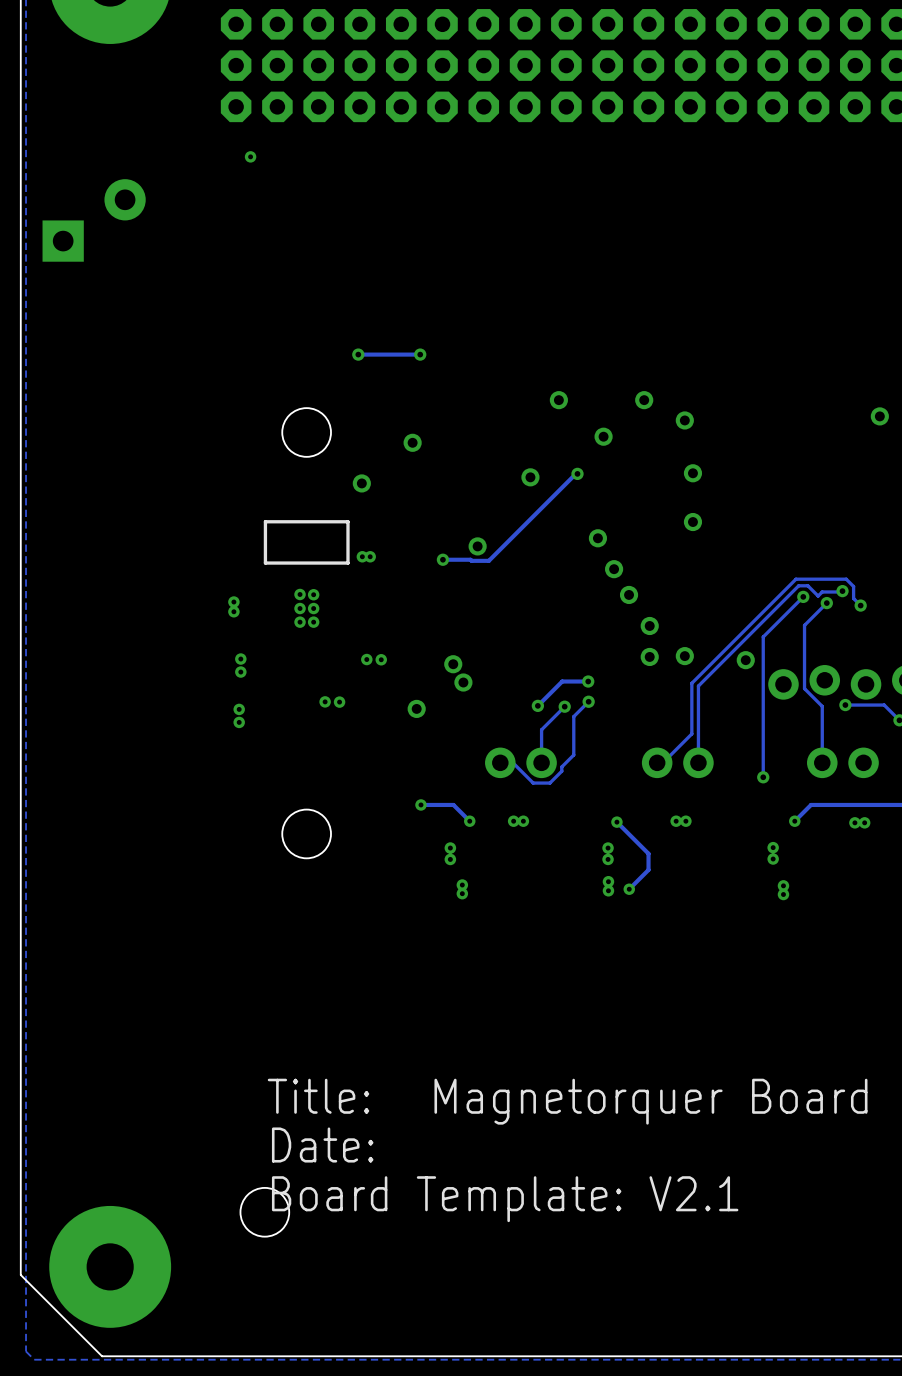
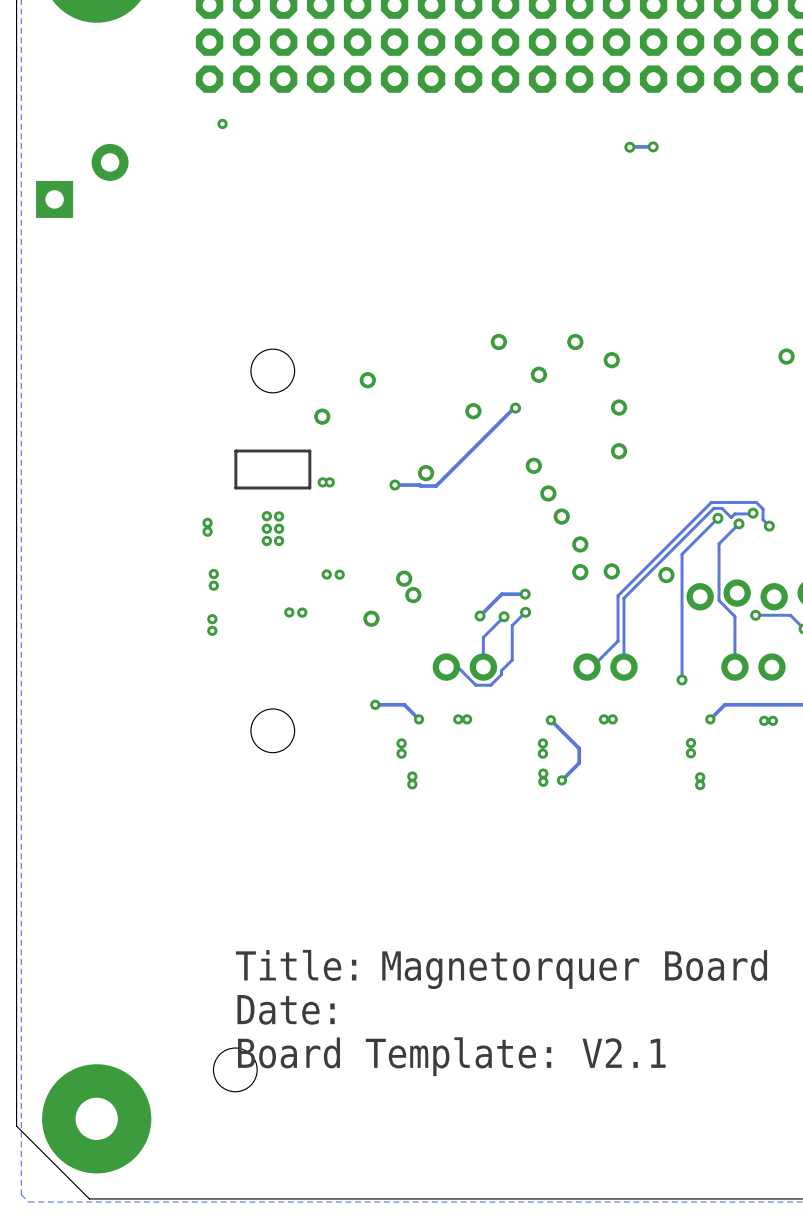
via: none -> (629, 147)
track: none -> (653, 146) (629, 147)
via: none -> (653, 146)
via: (358, 354) -> none
track: (420, 354) (358, 354) -> none
via: (420, 354) -> none

